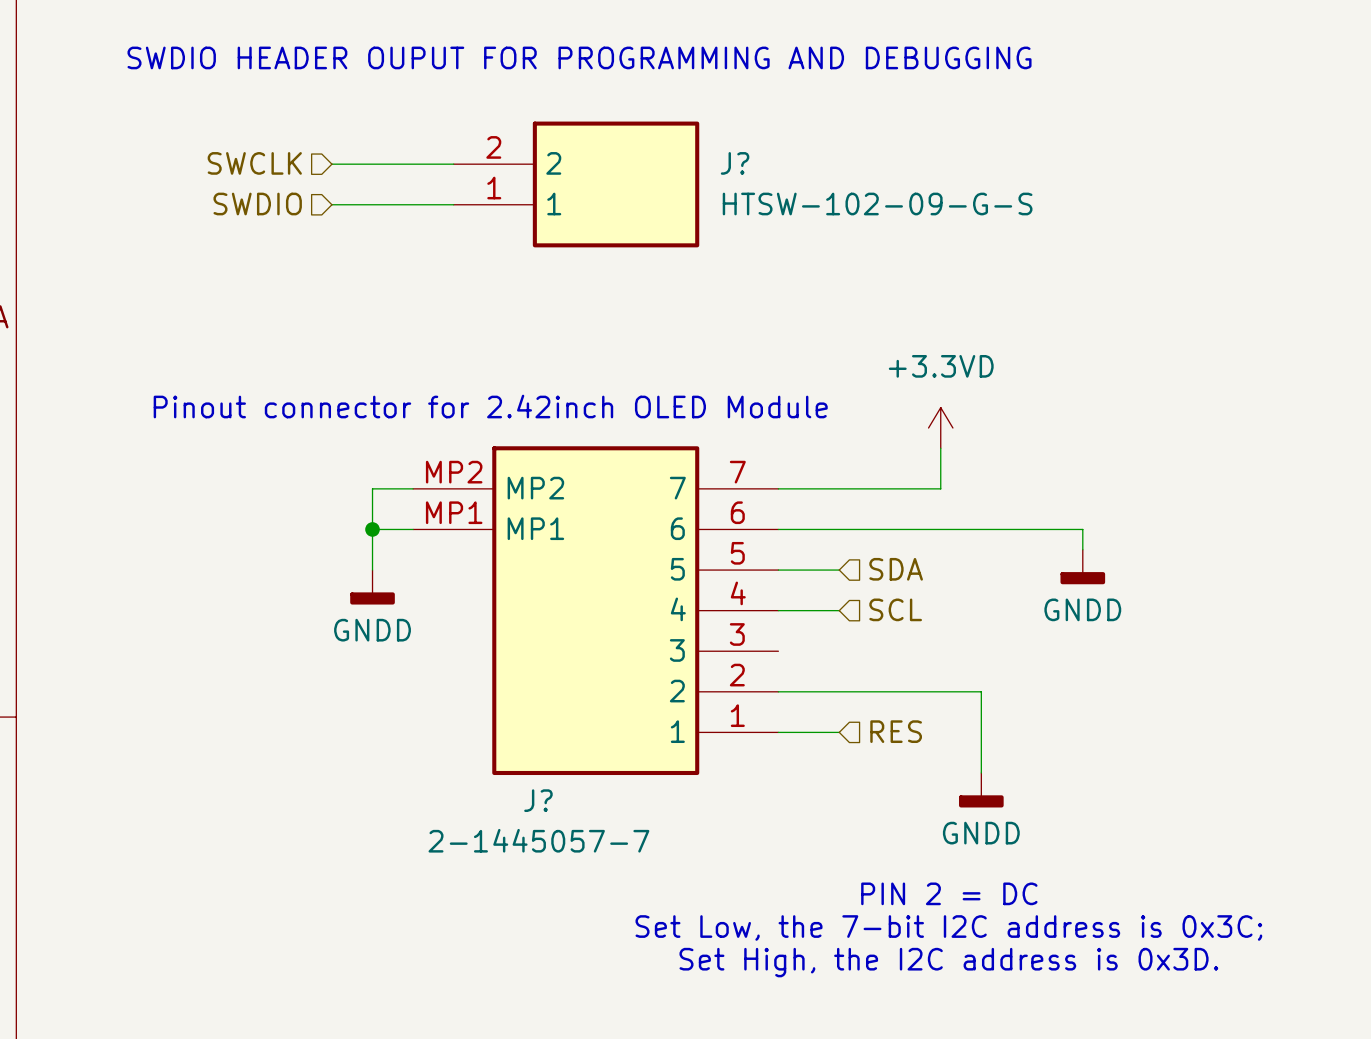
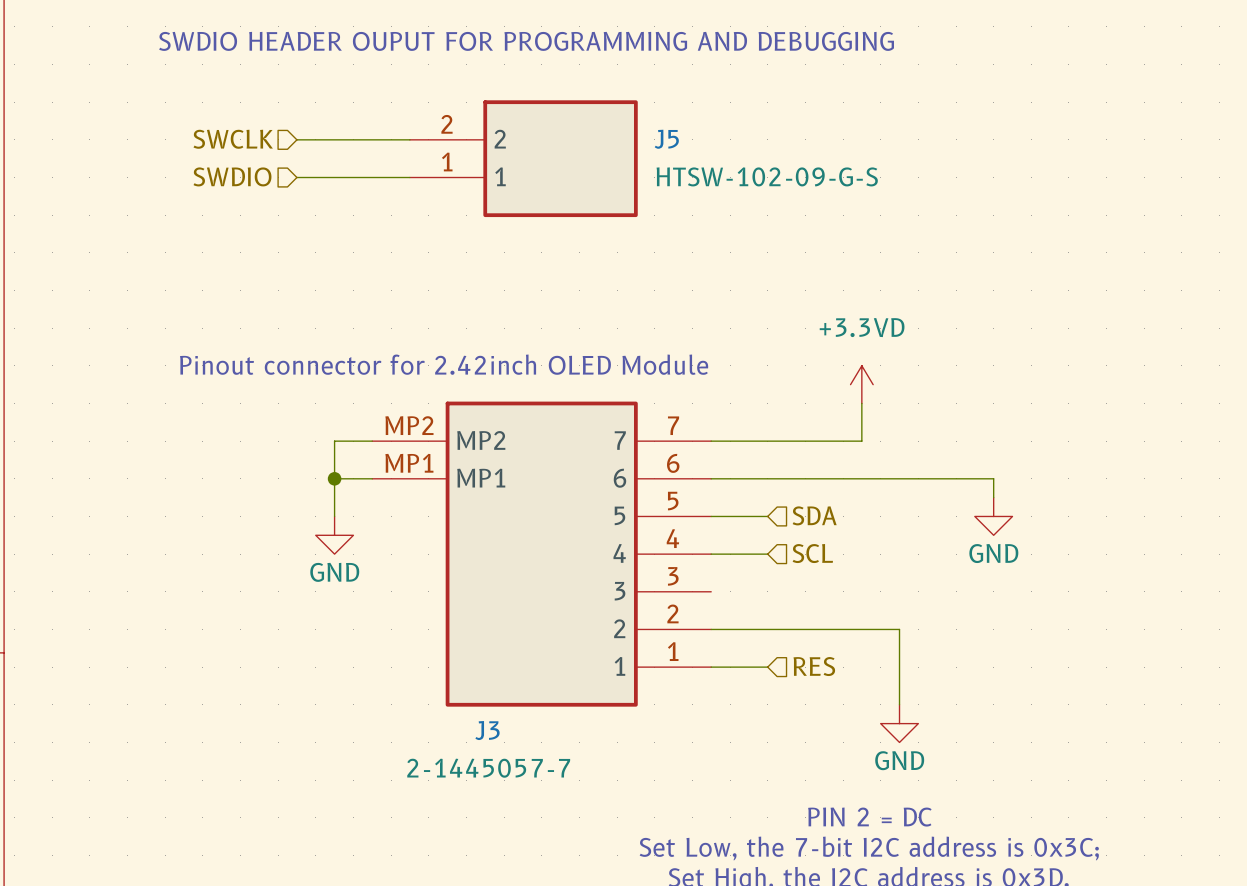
J? name: J? (735, 163) -> J5 (666, 139)
power symbol: GNDD (1082, 567) -> GND (993, 516)
power symbol: GNDD (372, 587) -> GND (334, 535)
power symbol: GNDD (981, 790) -> GND (899, 723)
J? name: J? (538, 800) -> J3 (487, 730)

